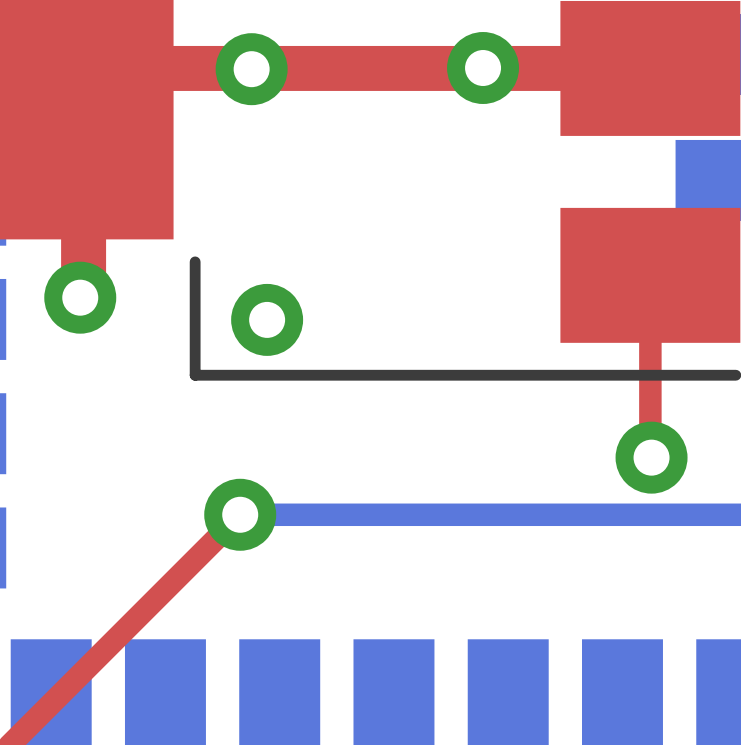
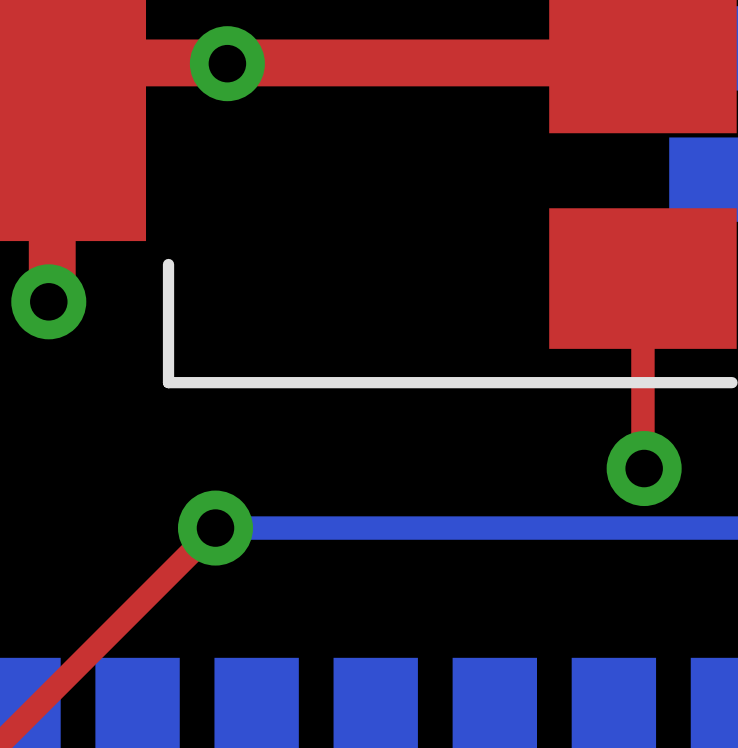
via: (483, 68) -> none
via: (267, 319) -> none

